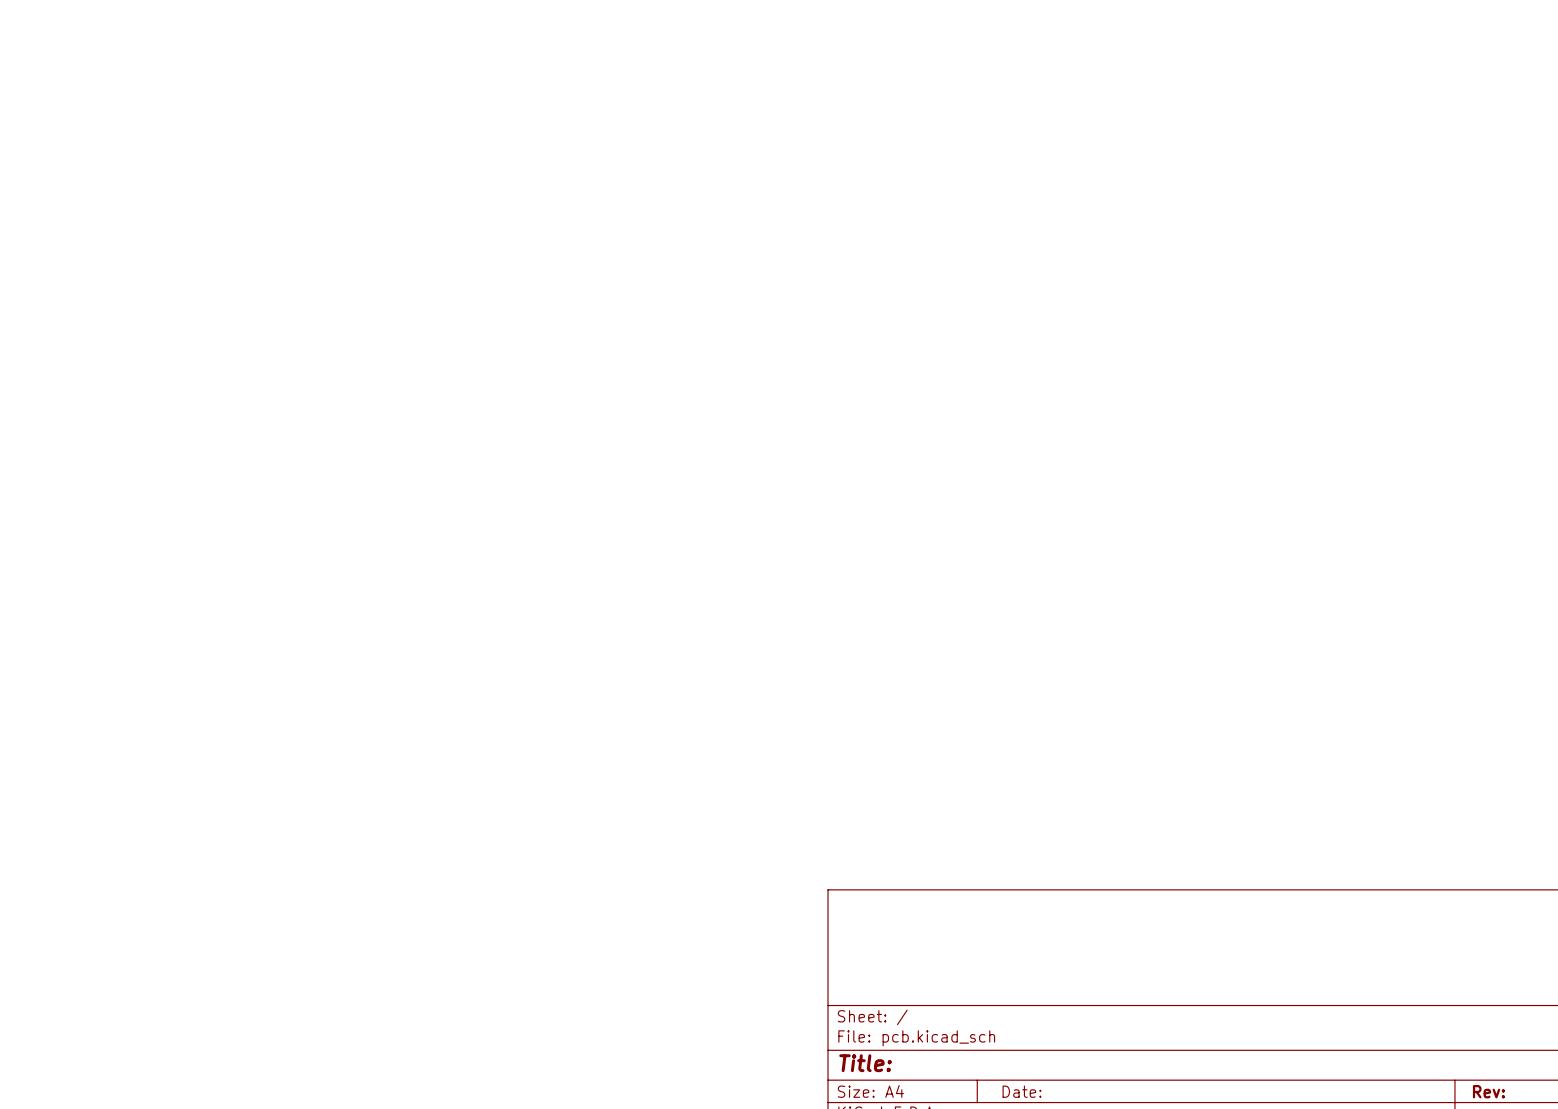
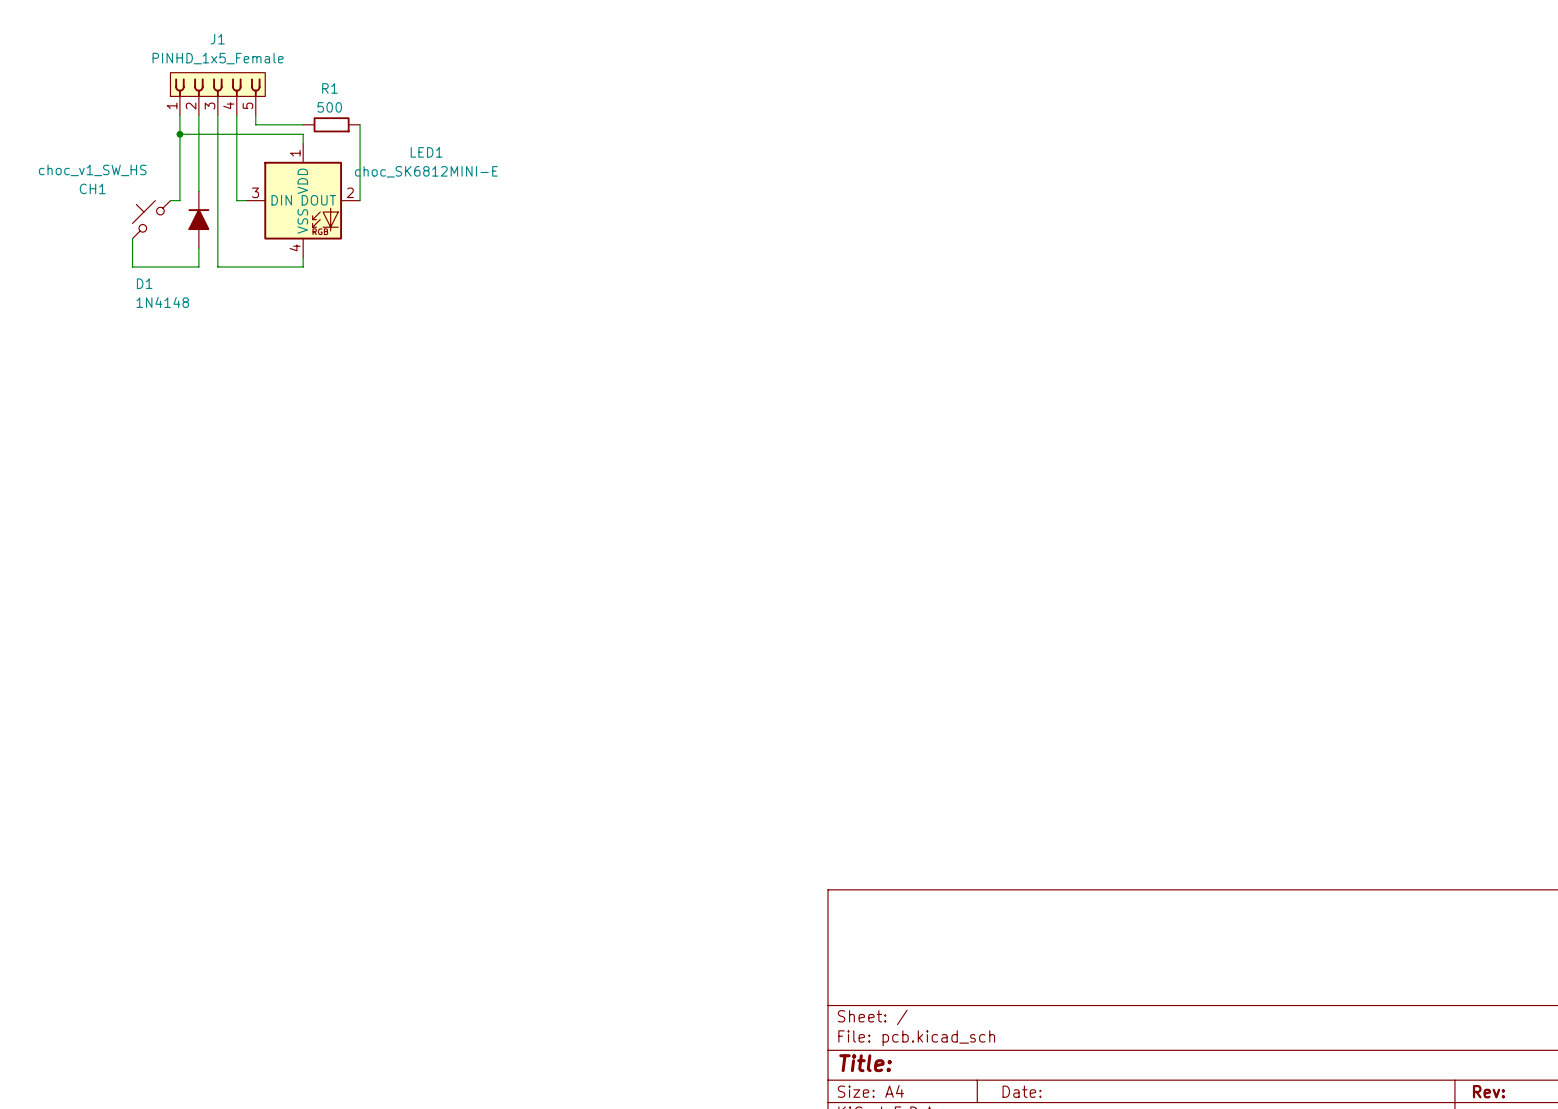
J1: none -> PINHD_1x5_Female (217, 94)
wire: none -> (179, 115) (179, 200) (170, 200)
wire: none -> (198, 115) (198, 191)
wire: none -> (217, 115) (217, 267) (303, 267) (303, 257)
wire: none -> (236, 115) (236, 200) (246, 200)
wire: none -> (255, 115) (255, 124) (303, 124)
R1: none -> 500 (331, 124)
wire: none -> (360, 124) (360, 200)
wire: none -> (179, 134) (303, 134) (303, 143)
junction: none -> (179, 134)
LED1: none -> choc_SK6812MINI-E (303, 200)
CH1: none -> choc_v1_SW_HS (151, 219)
D1: none -> 1N4148 (198, 219)
wire: none -> (132, 238) (132, 267) (198, 267) (198, 248)

